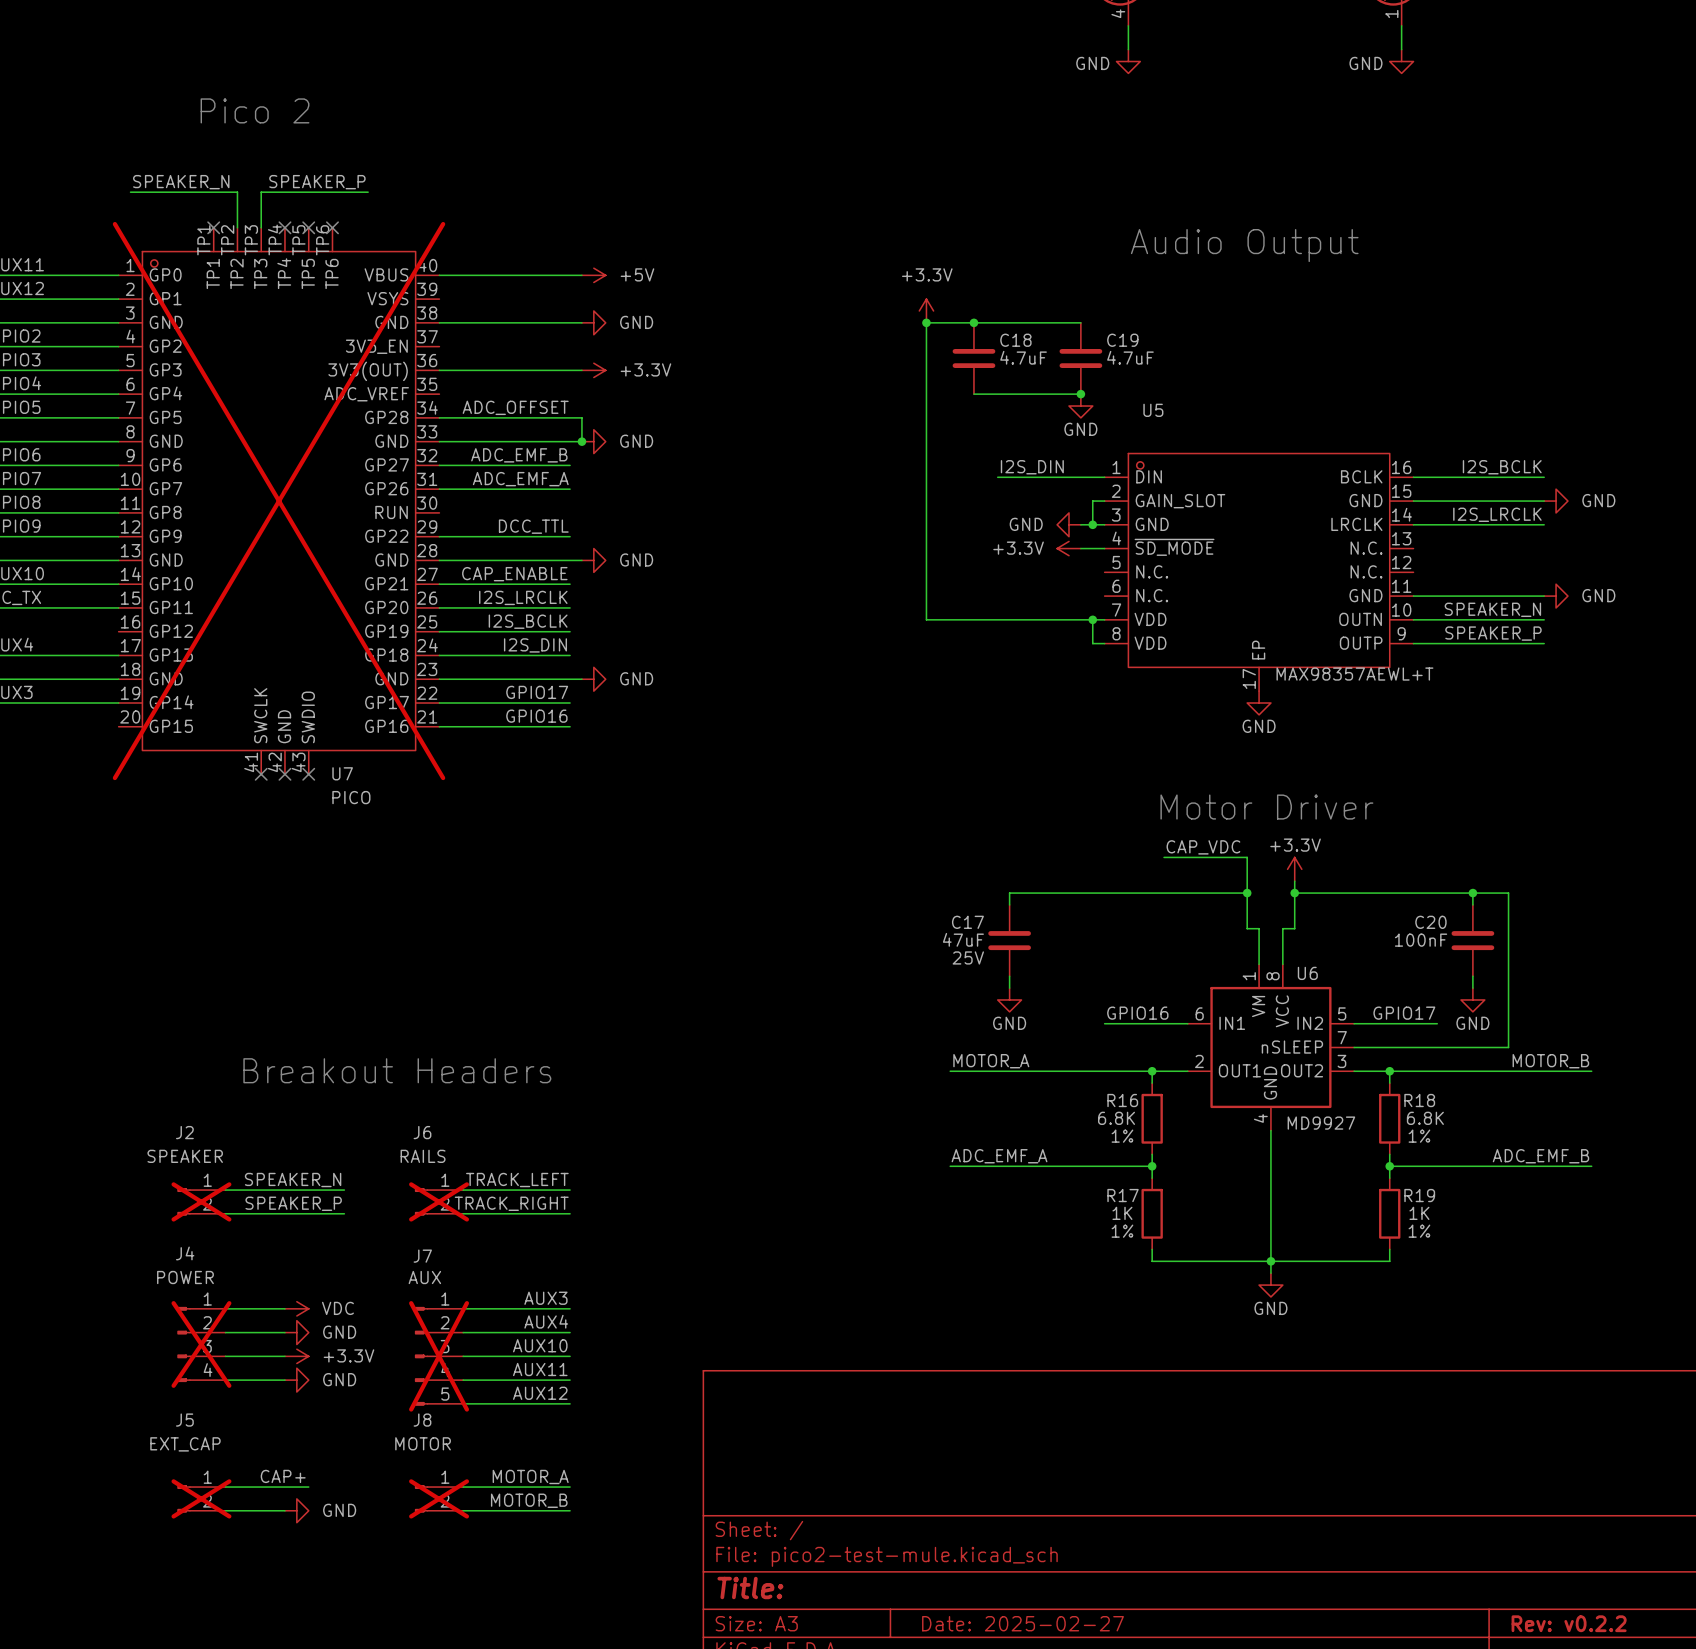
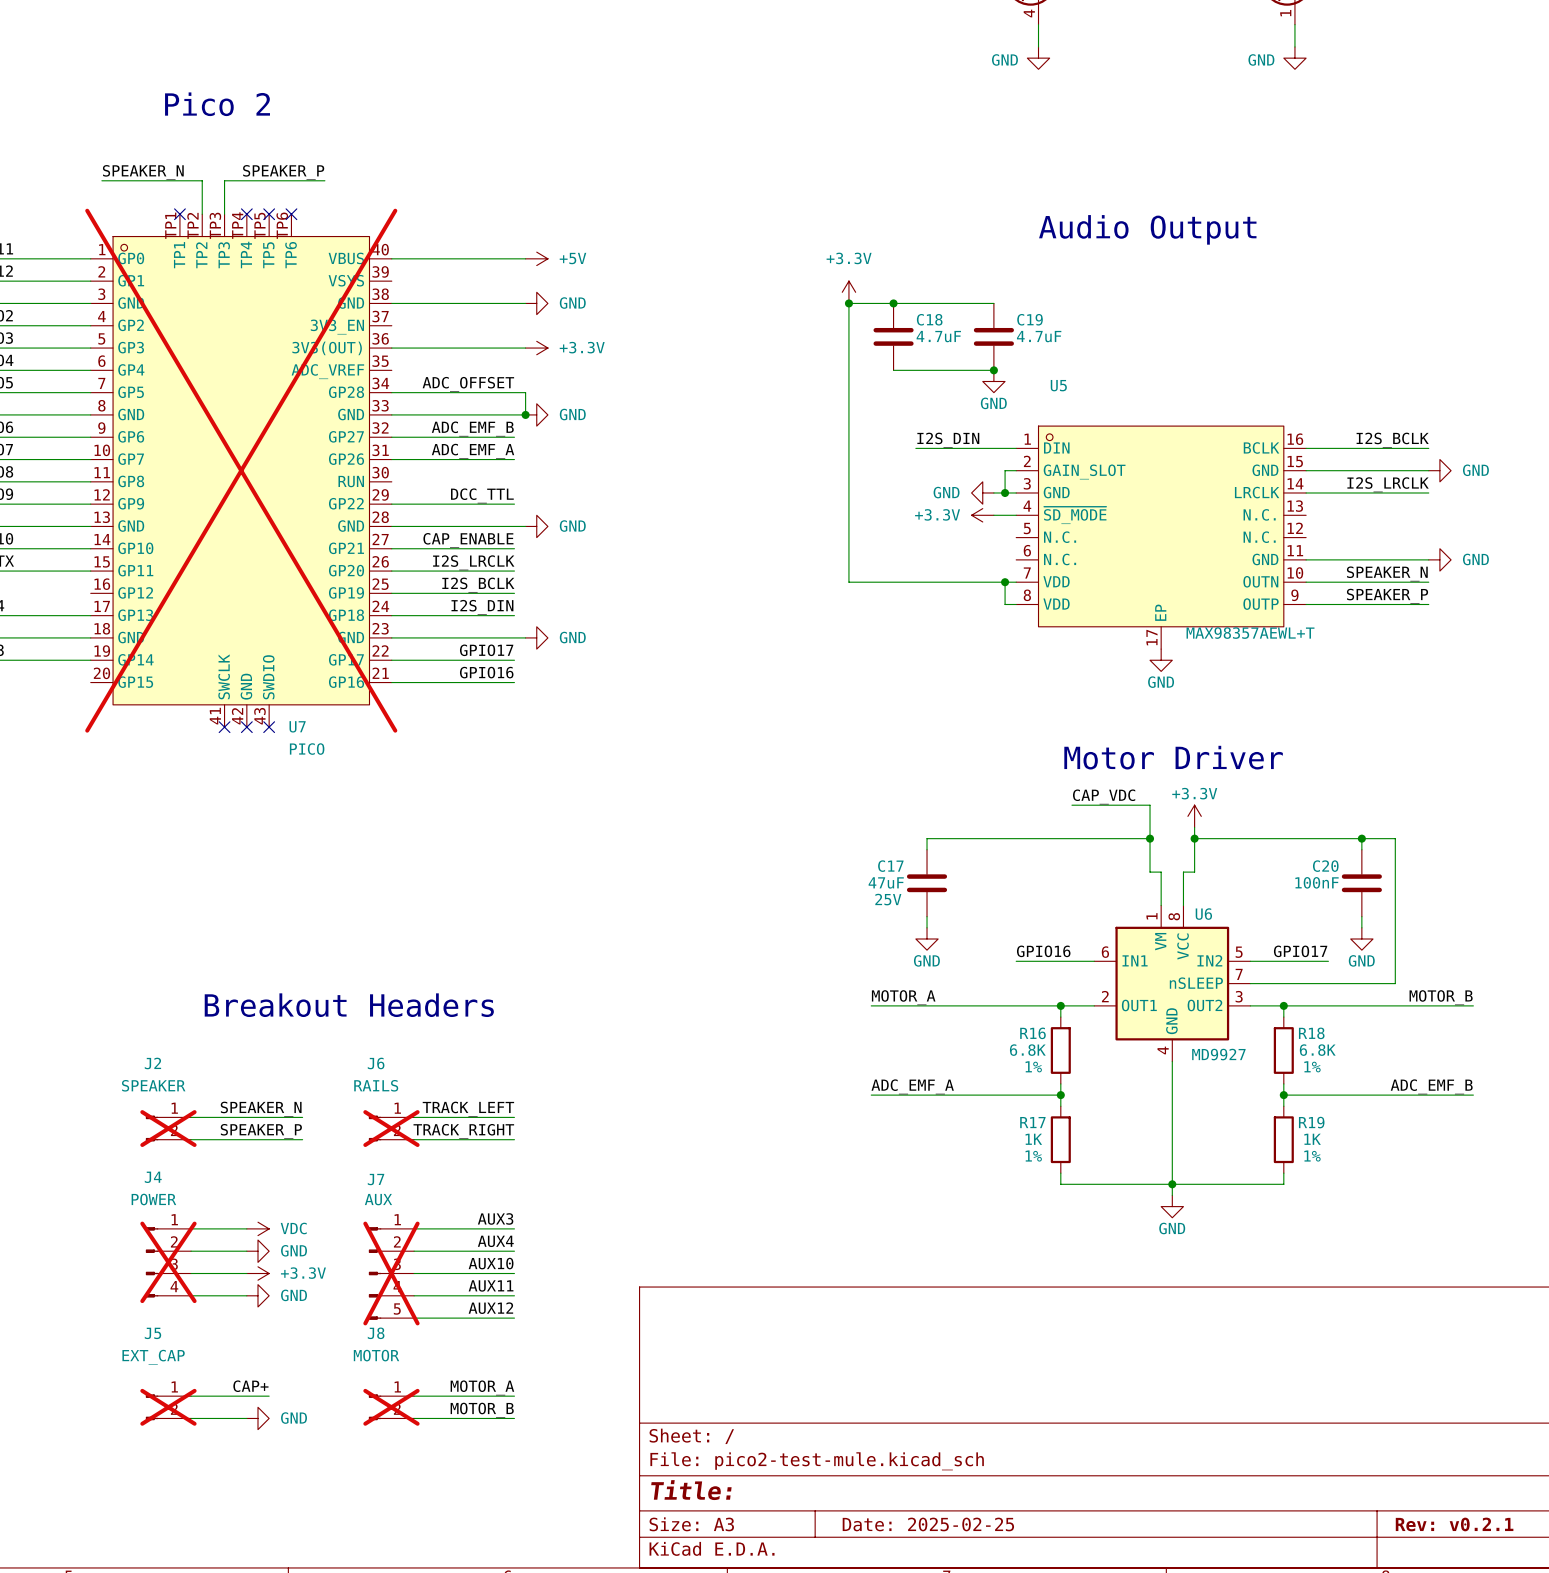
title block: Date: 2025-02-27 (1023, 1623) -> Date: 2025-02-25 (928, 1524)
title block: Rev: v0.2.2 (1569, 1623) -> Rev: v0.2.1 (1454, 1524)

